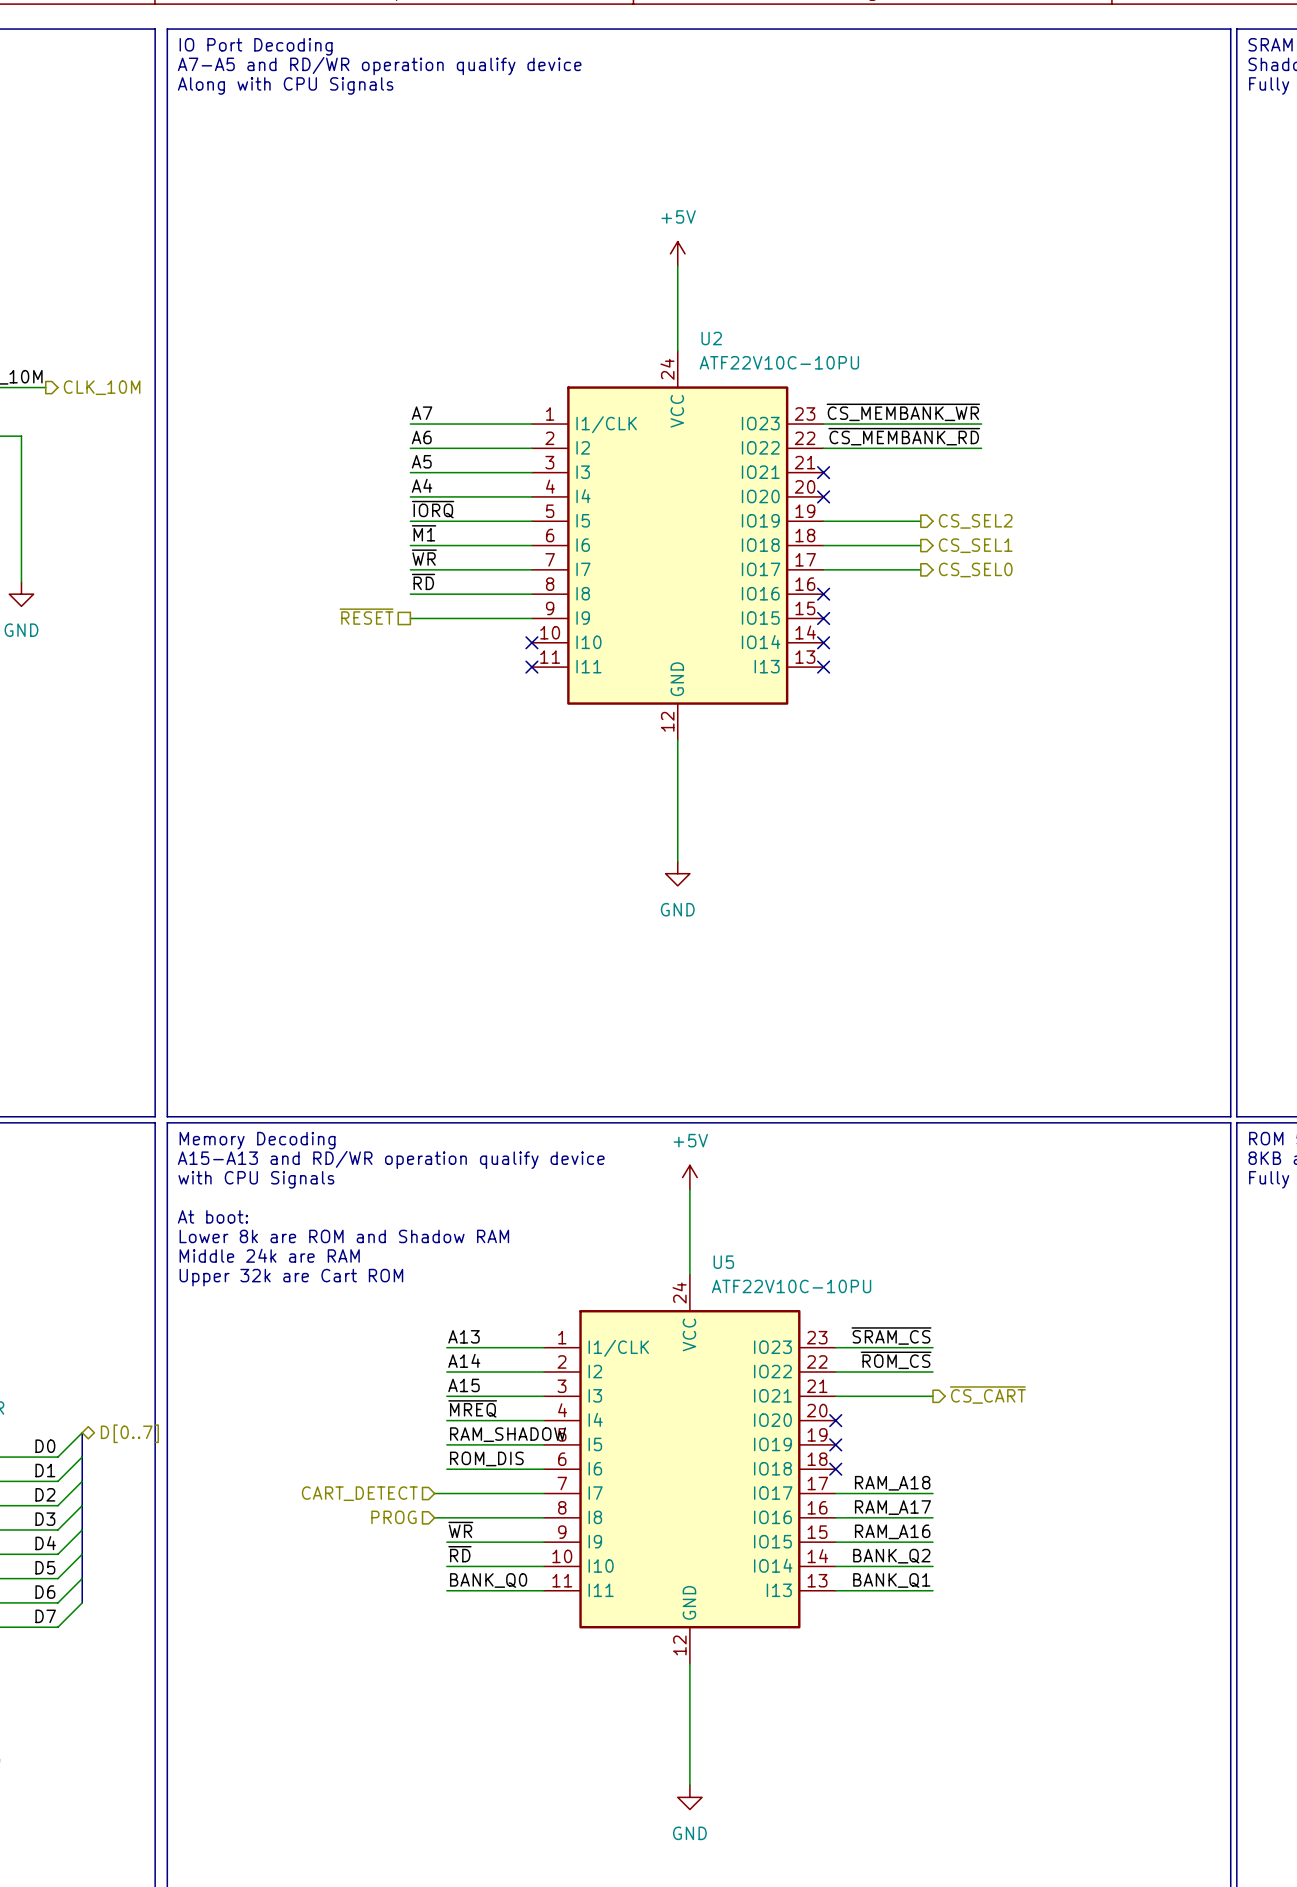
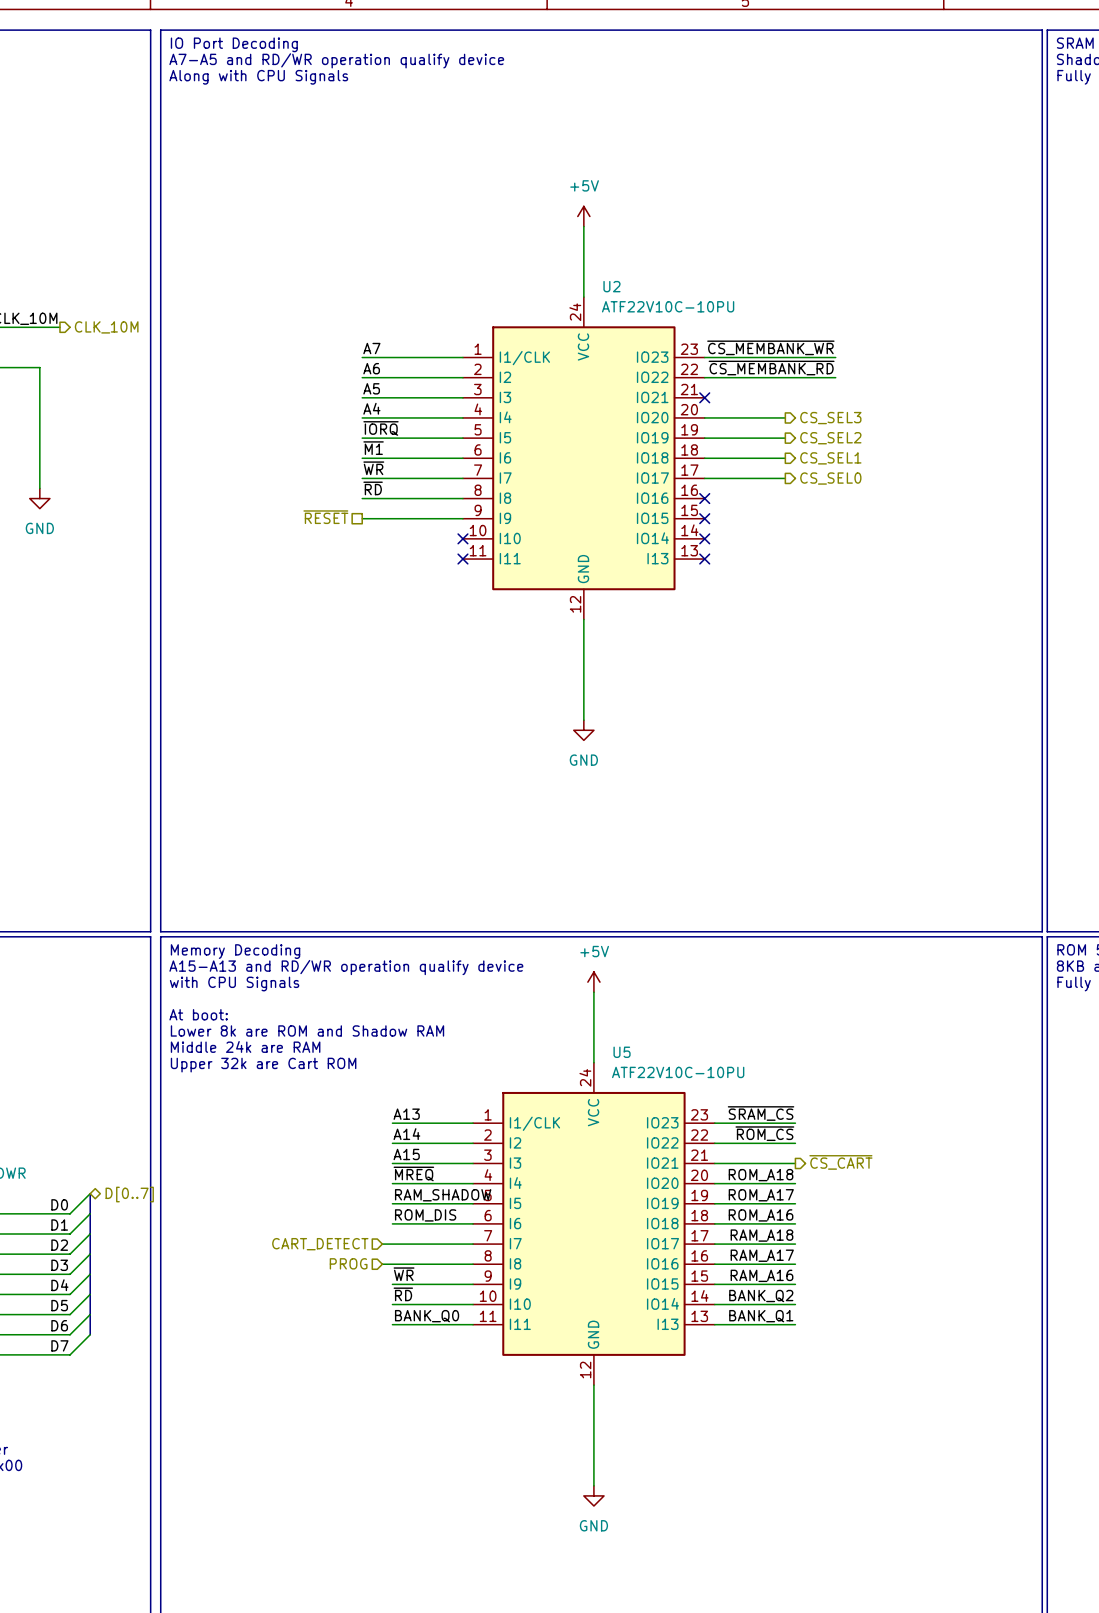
wire: none -> (704, 417) (785, 417)
no-connect mark: (823, 496) -> none
hierarchical label: none -> CS_SEL3 (830, 418)
label: none -> ROM_A18 (761, 1175)
wire: none -> (714, 1183) (795, 1183)
no-connect mark: (835, 1420) -> none
label: none -> ROM_A17 (761, 1195)
wire: none -> (714, 1203) (795, 1203)
no-connect mark: (835, 1444) -> none
label: none -> ROM_A16 (761, 1215)
wire: none -> (714, 1223) (795, 1223)
no-connect mark: (835, 1469) -> none

